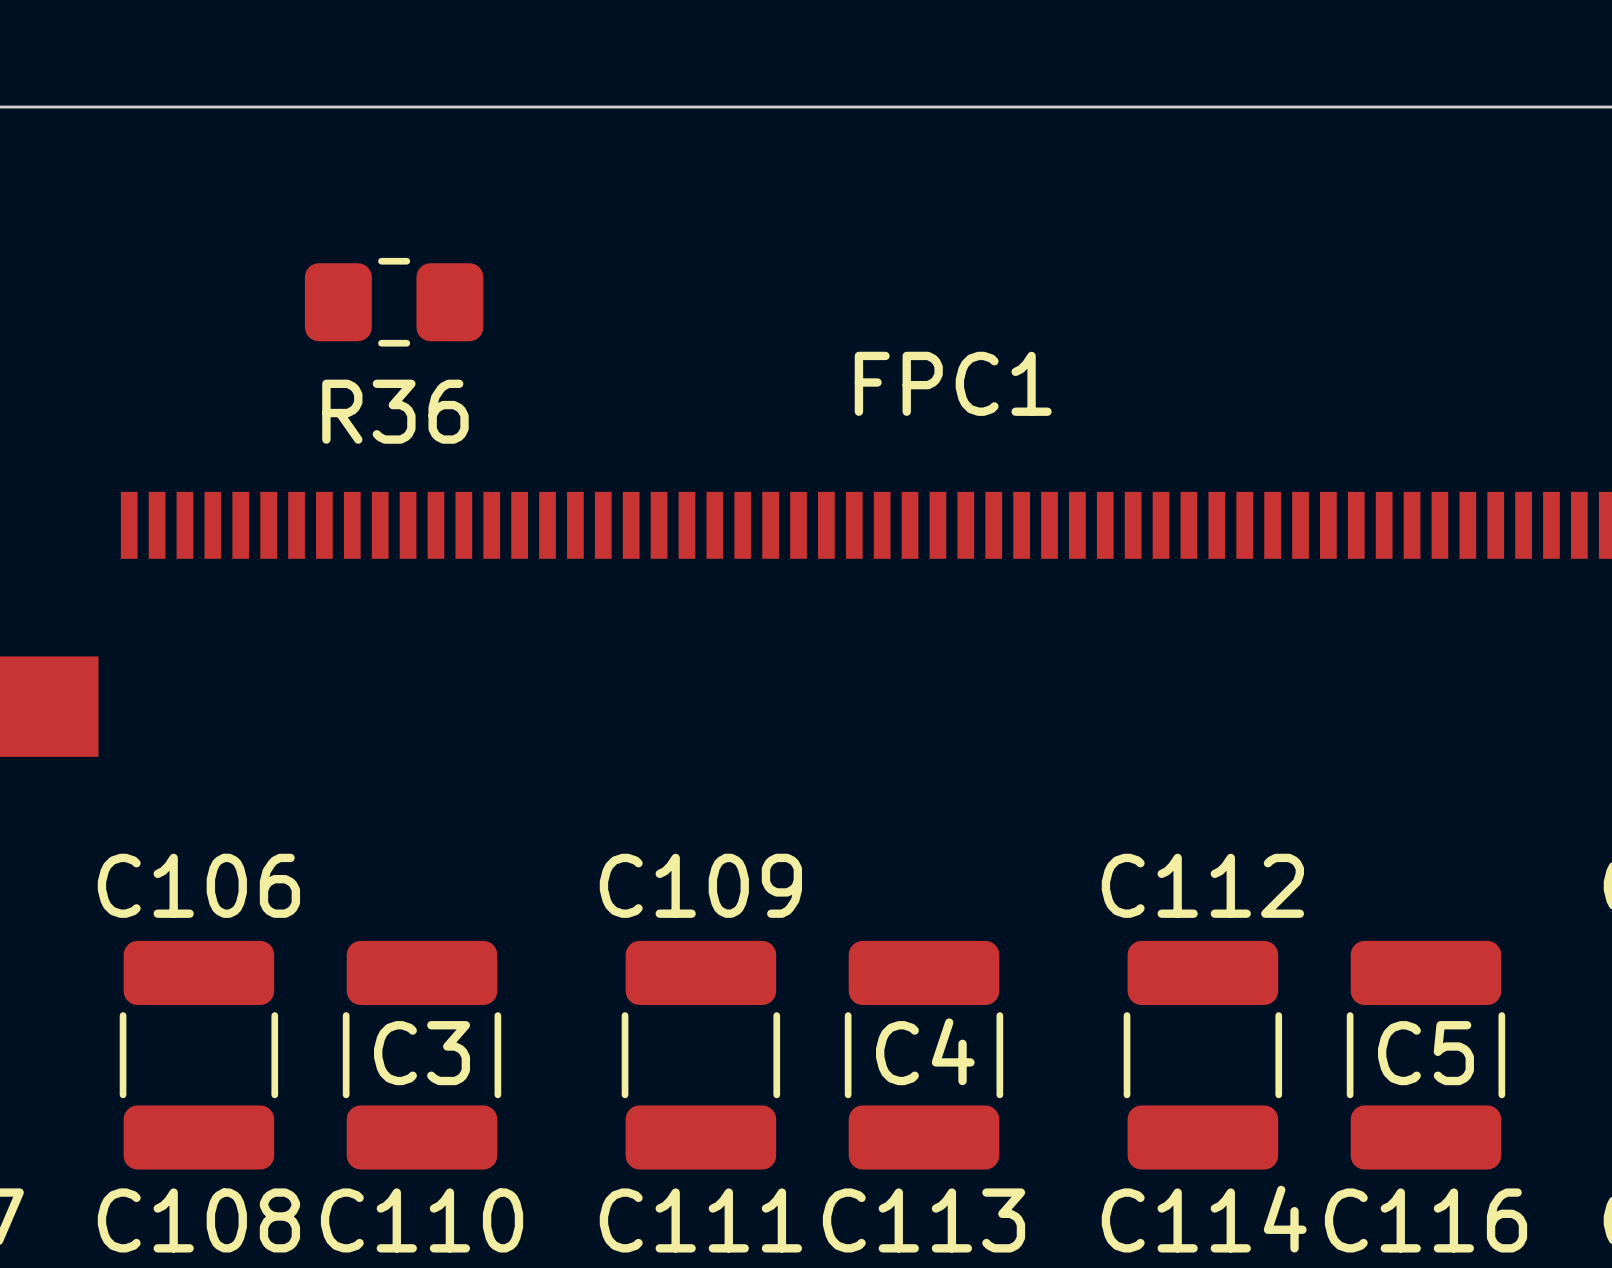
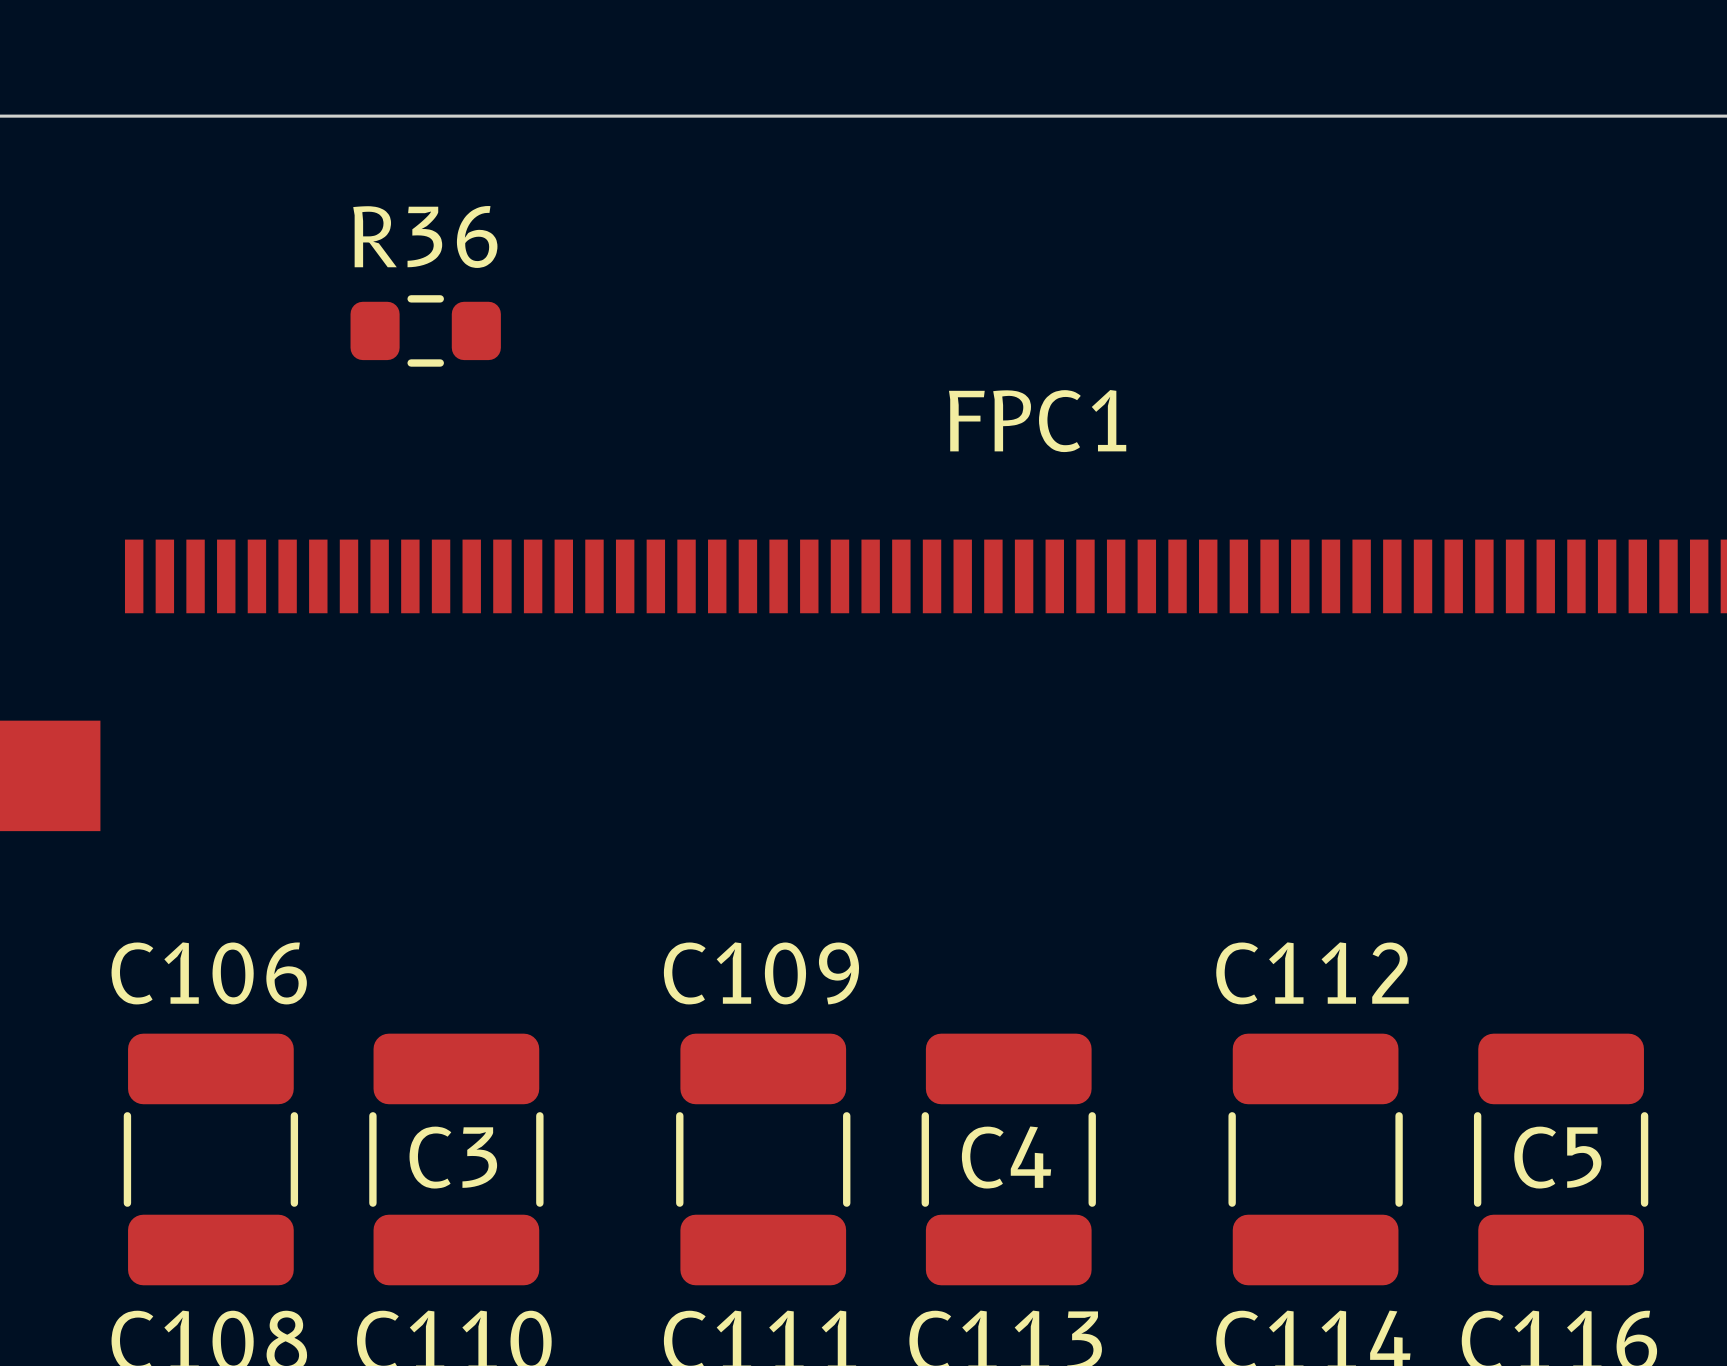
R36 footprint: [304, 257, 484, 347] -> [350, 295, 501, 367]
R36 name position: R36 (395, 411) -> R36 (425, 236)

